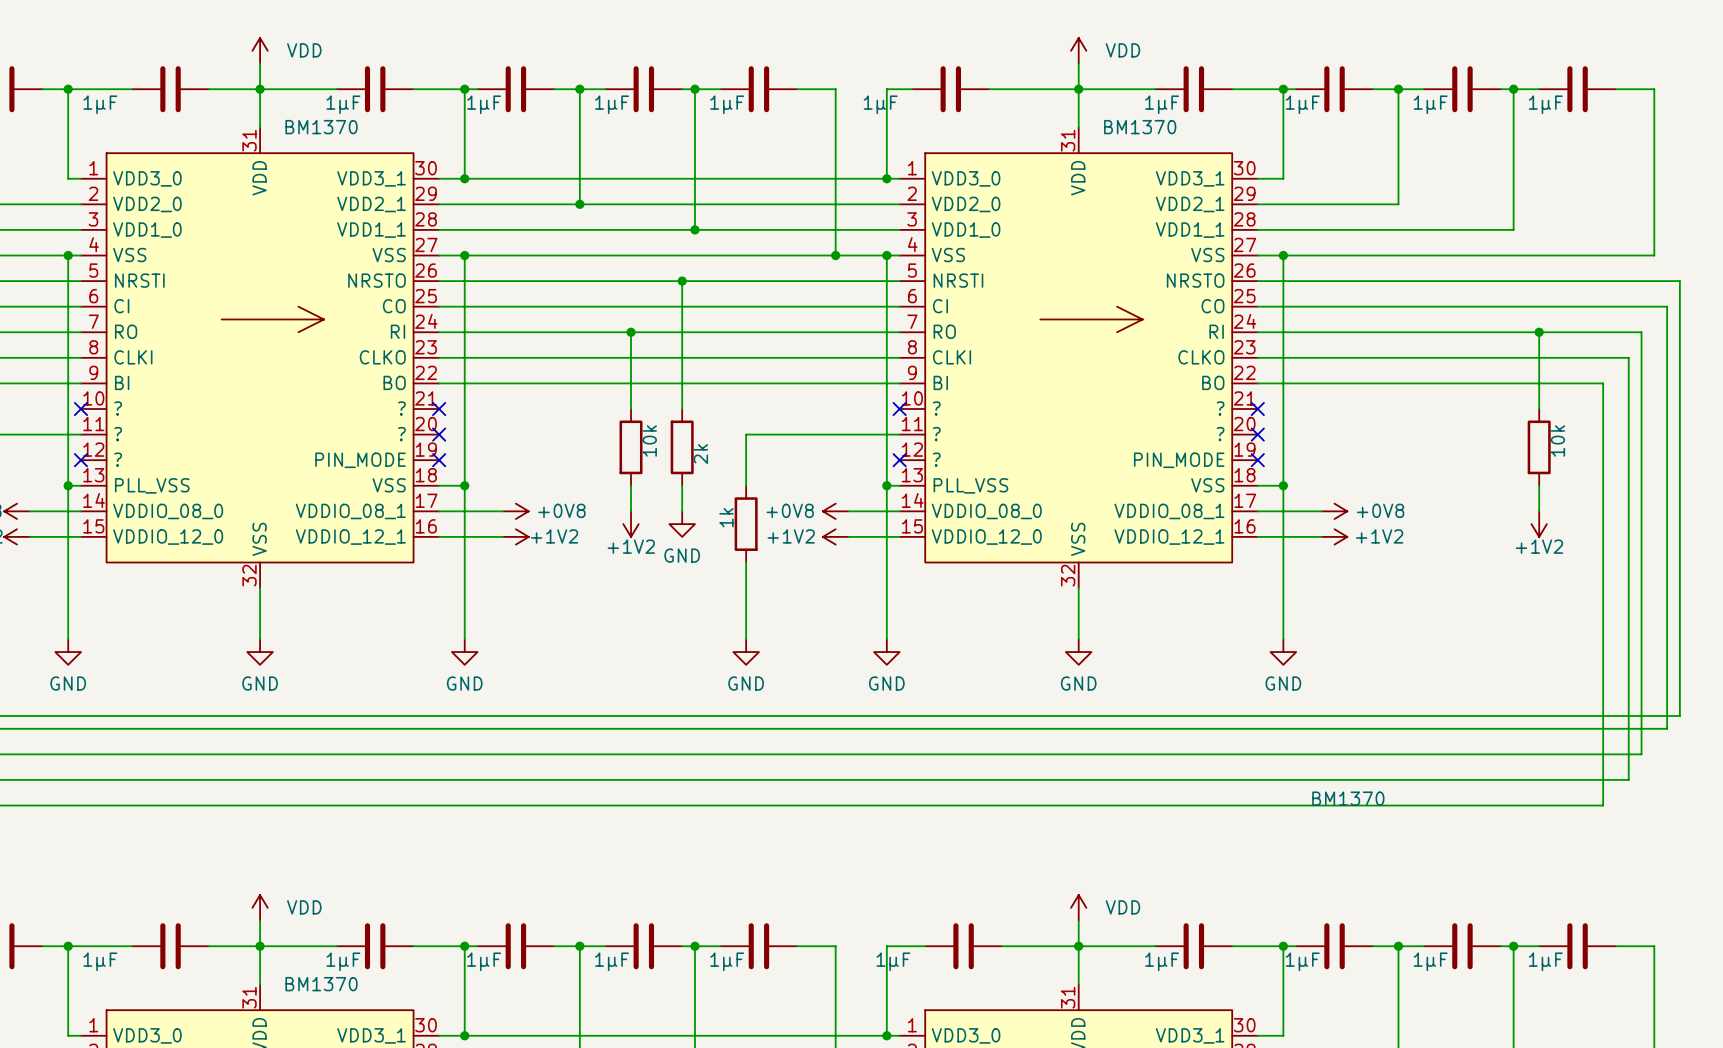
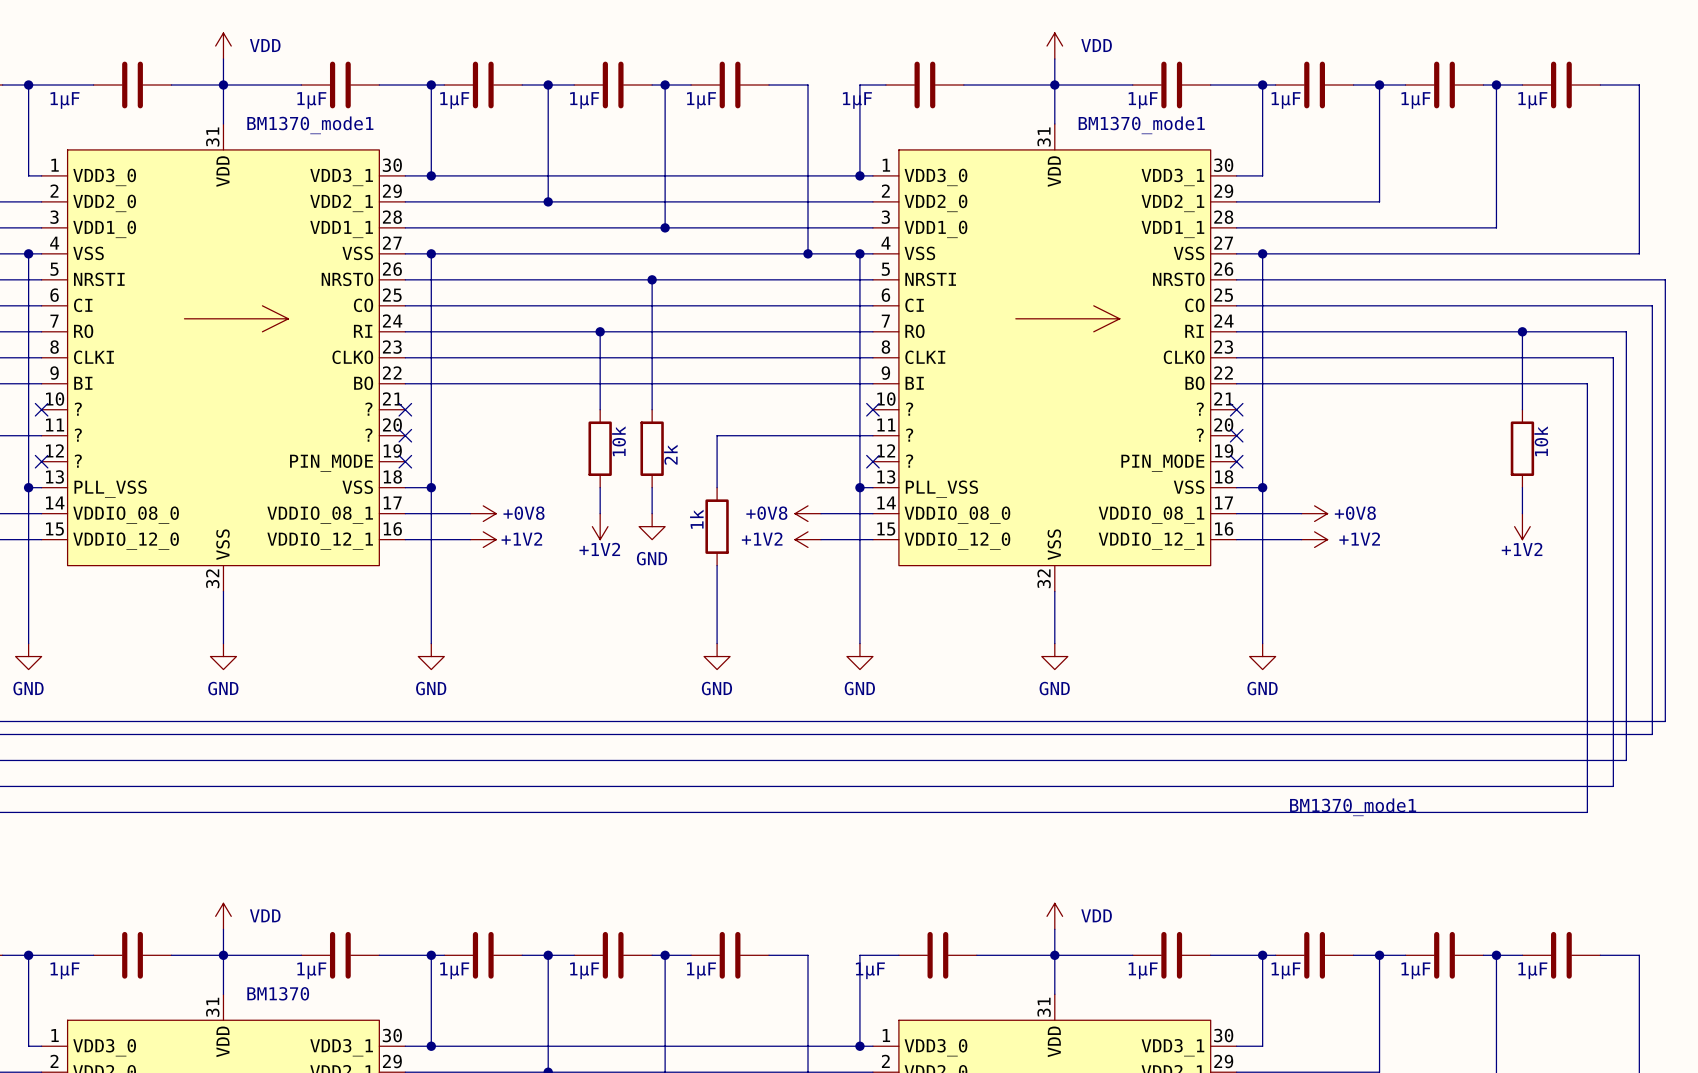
part value: BM1370 (321, 127) -> BM1370_mode1 (310, 125)
part value: BM1370 (1140, 127) -> BM1370_mode1 (1141, 125)
part value: BM1370 (1348, 798) -> BM1370_mode1 (1353, 807)

